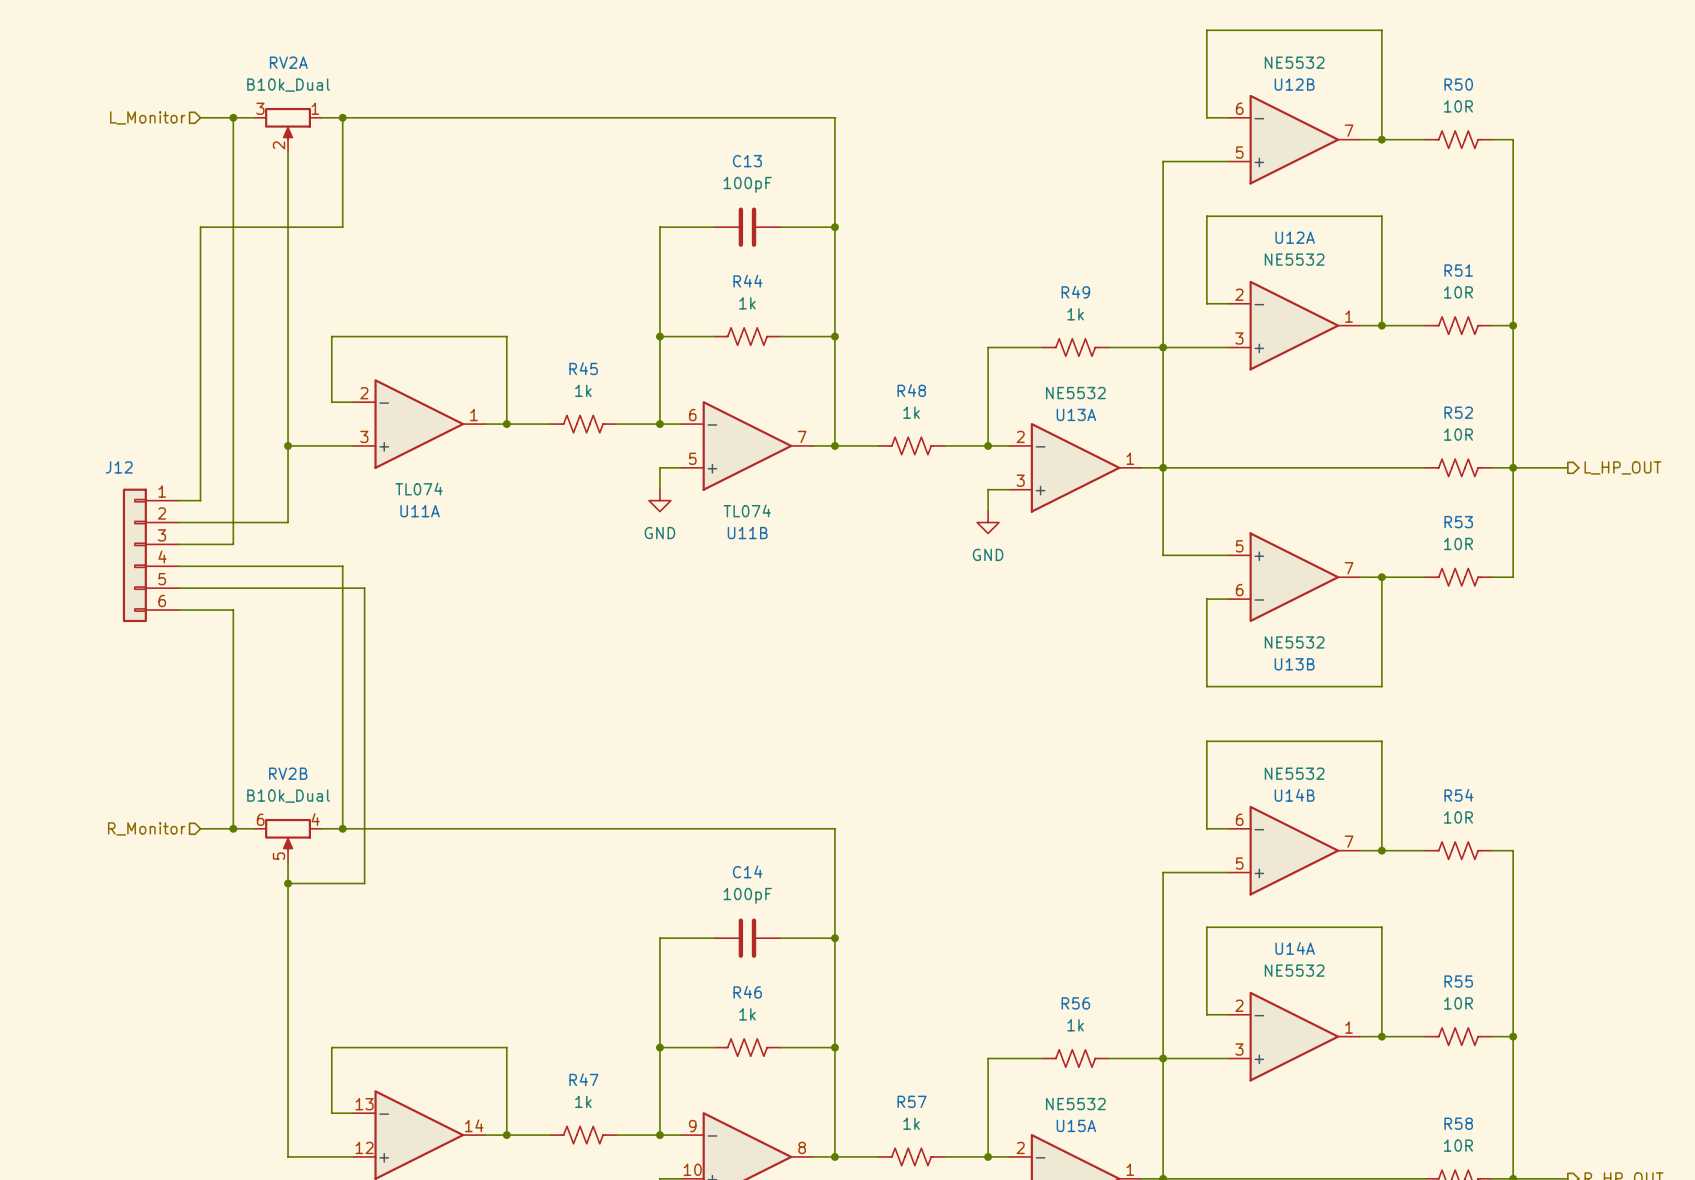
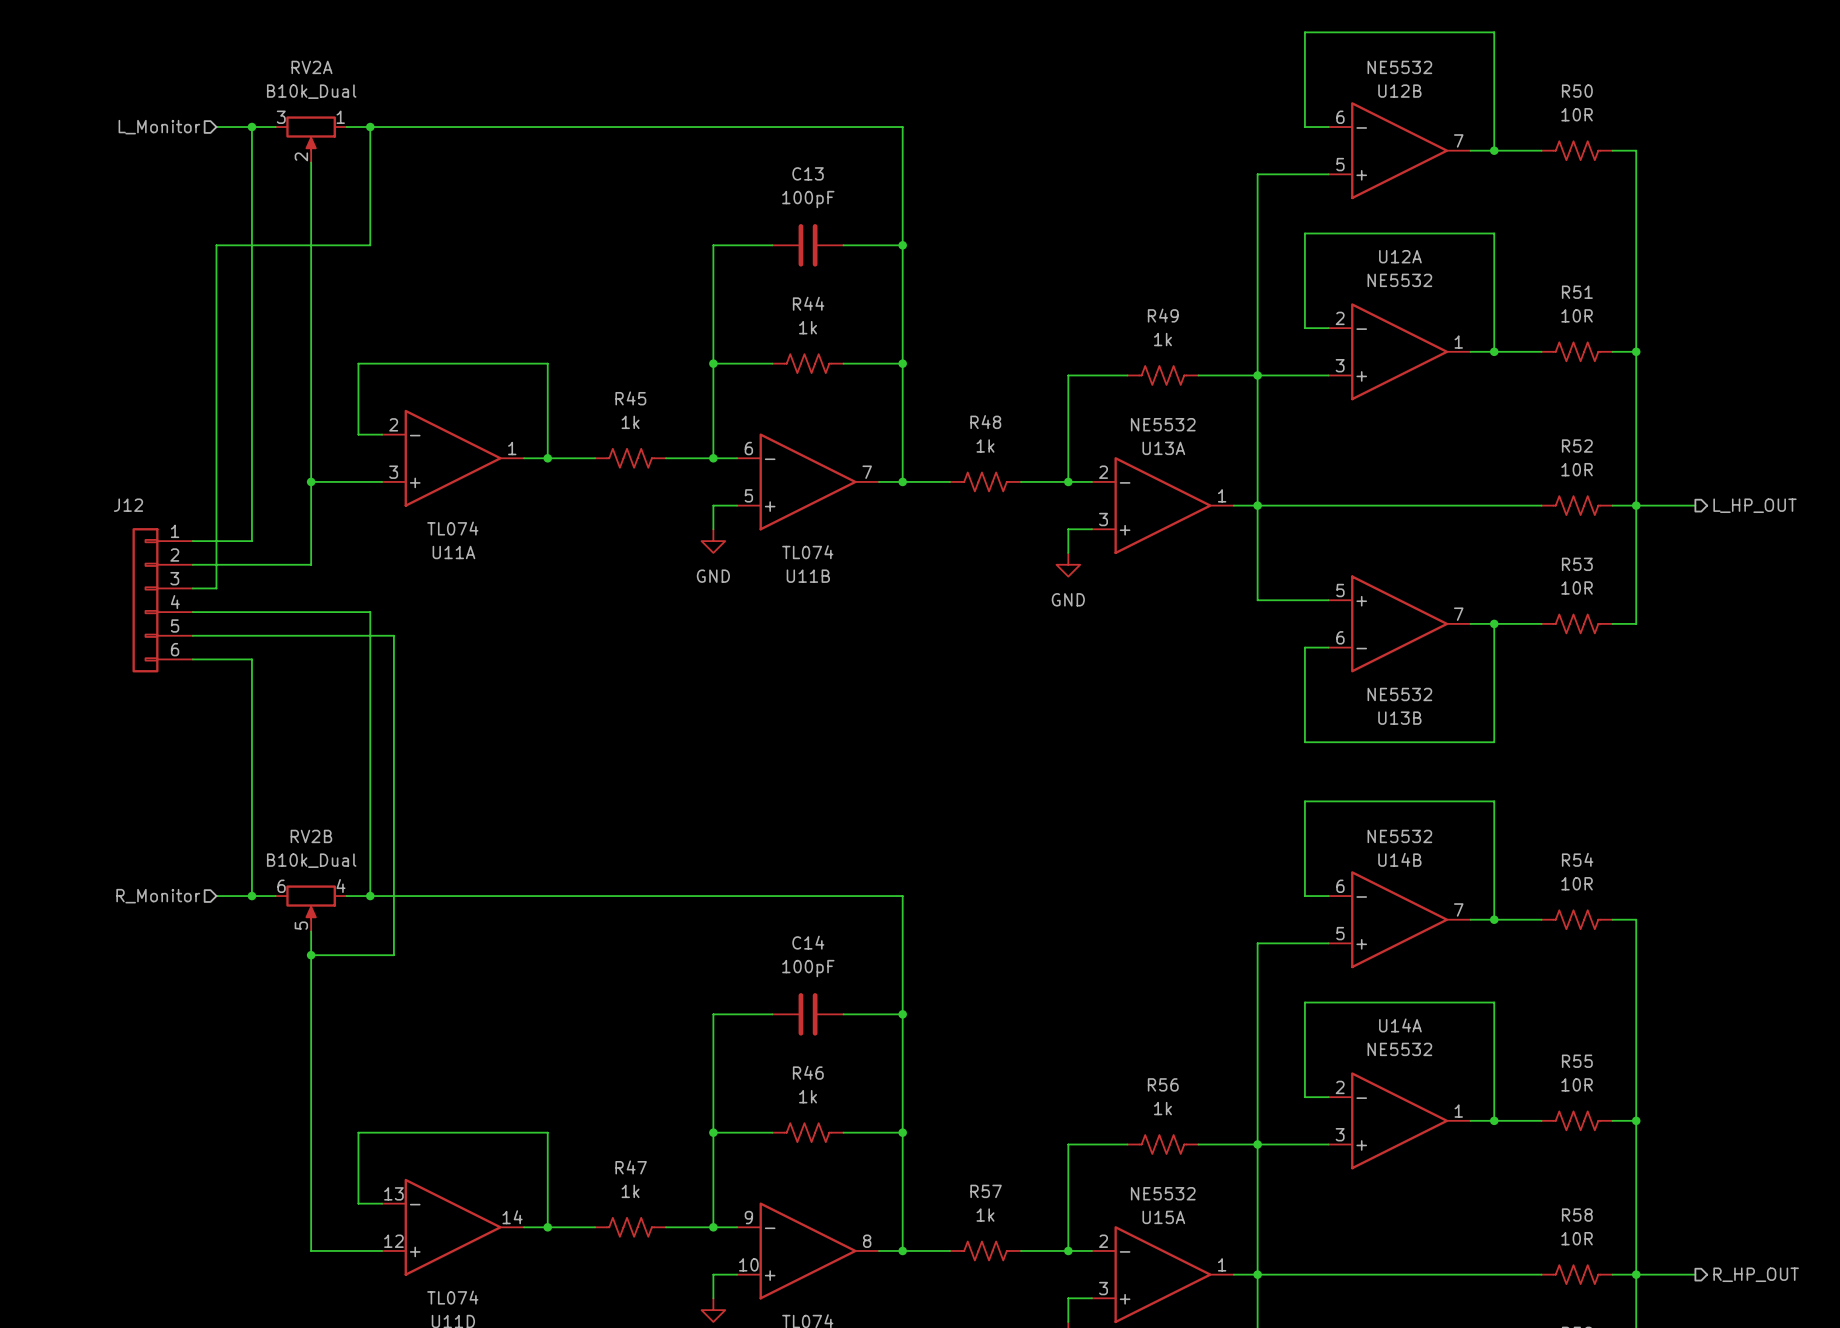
wire: (233, 500) (233, 544) (200, 544) -> (251, 541) (216, 541) (216, 588)

